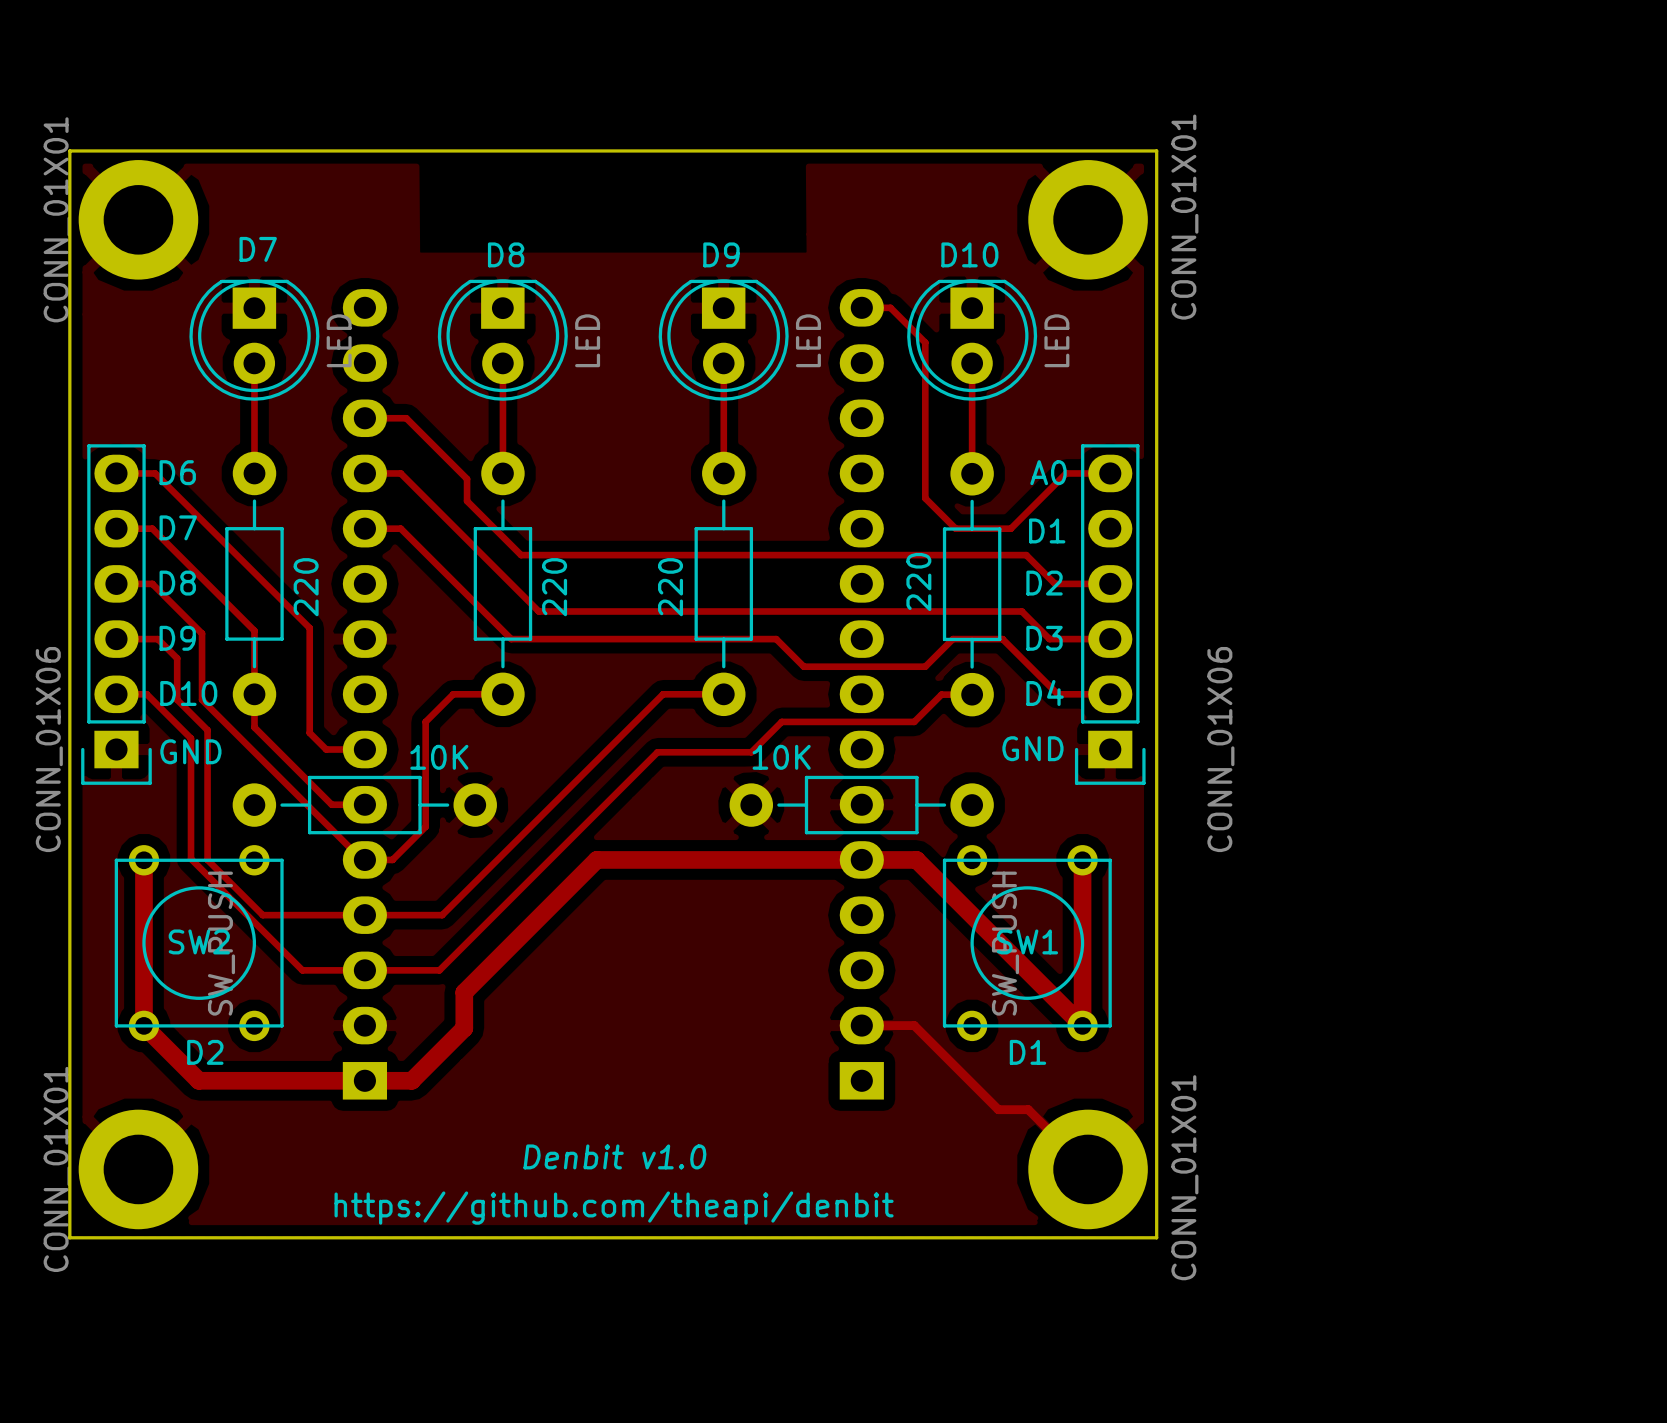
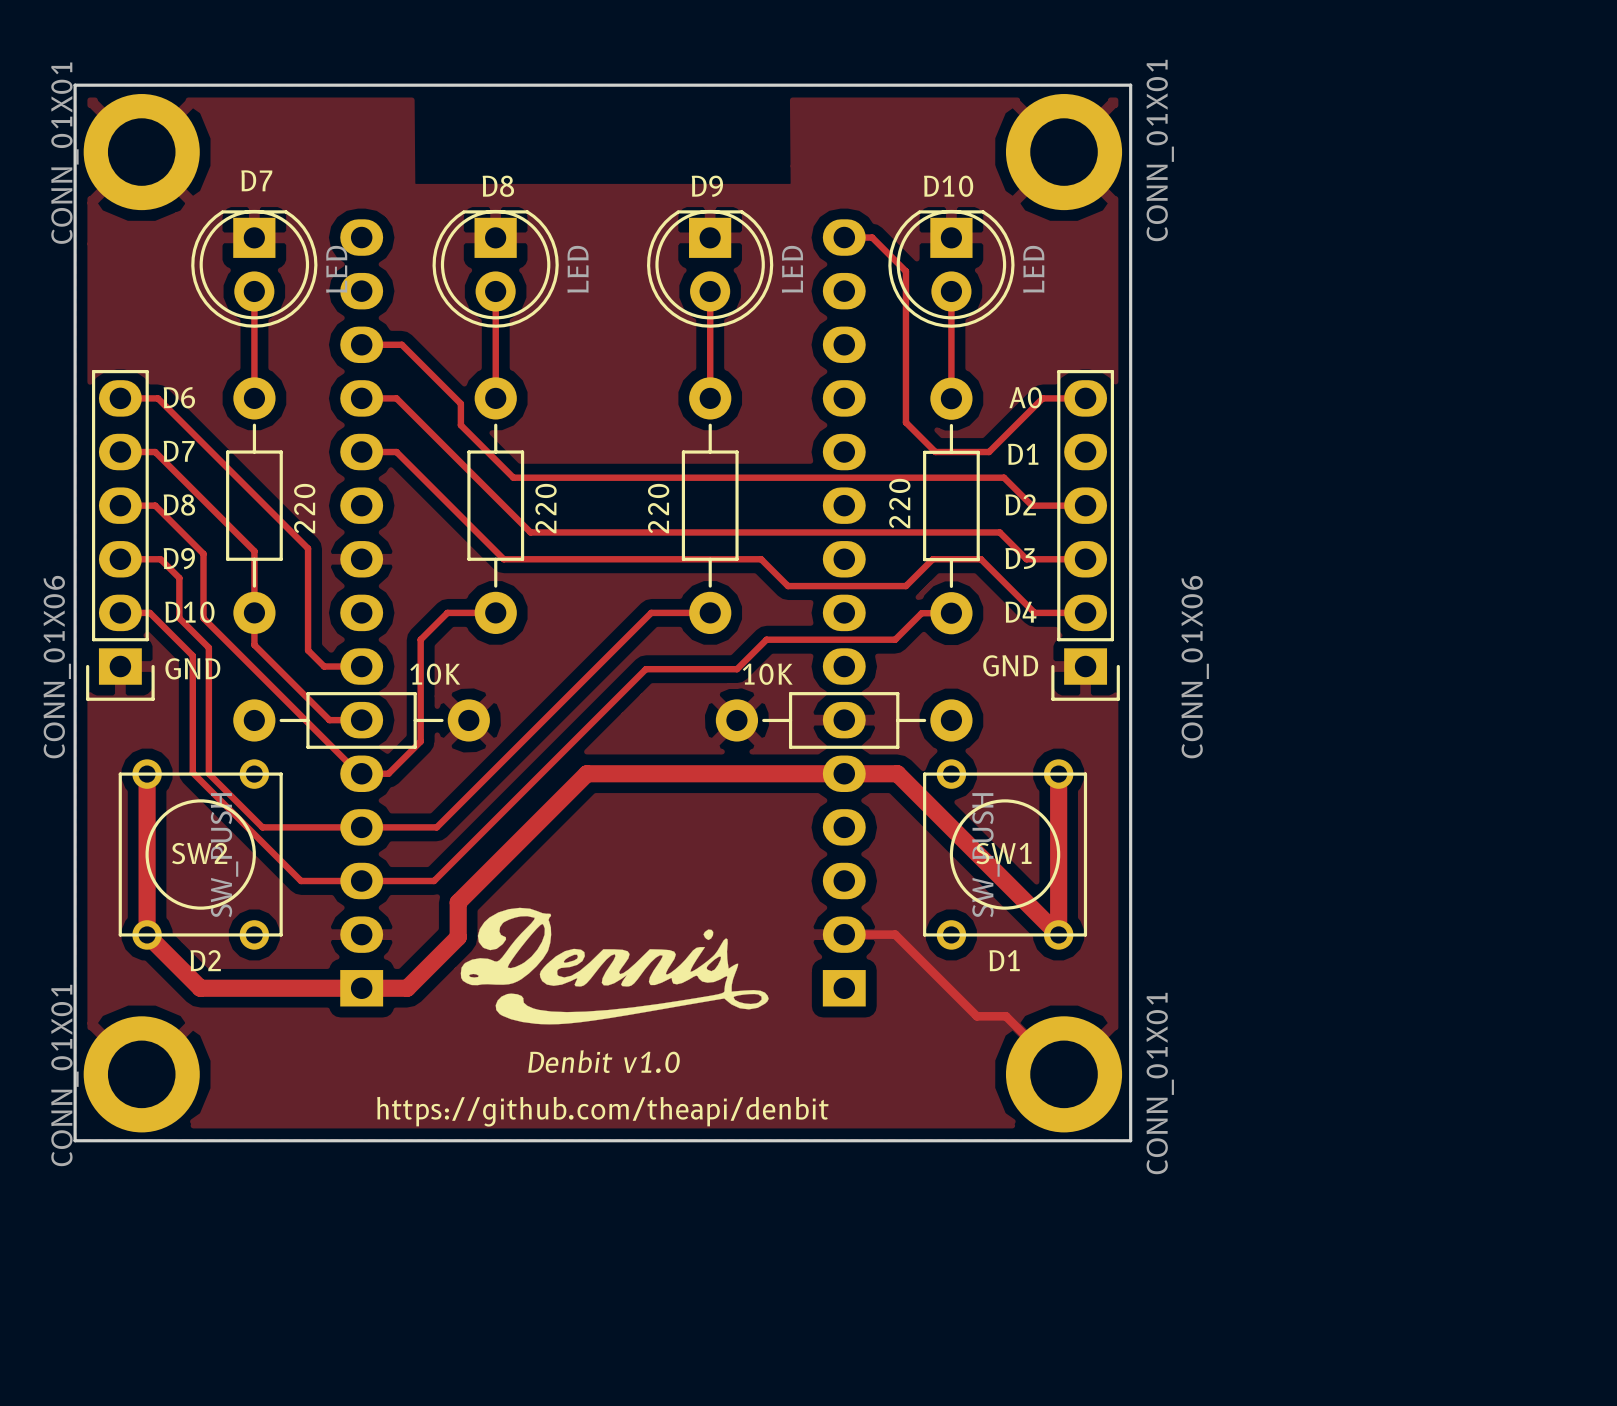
drawing: none -> [460, 907, 769, 1025]

